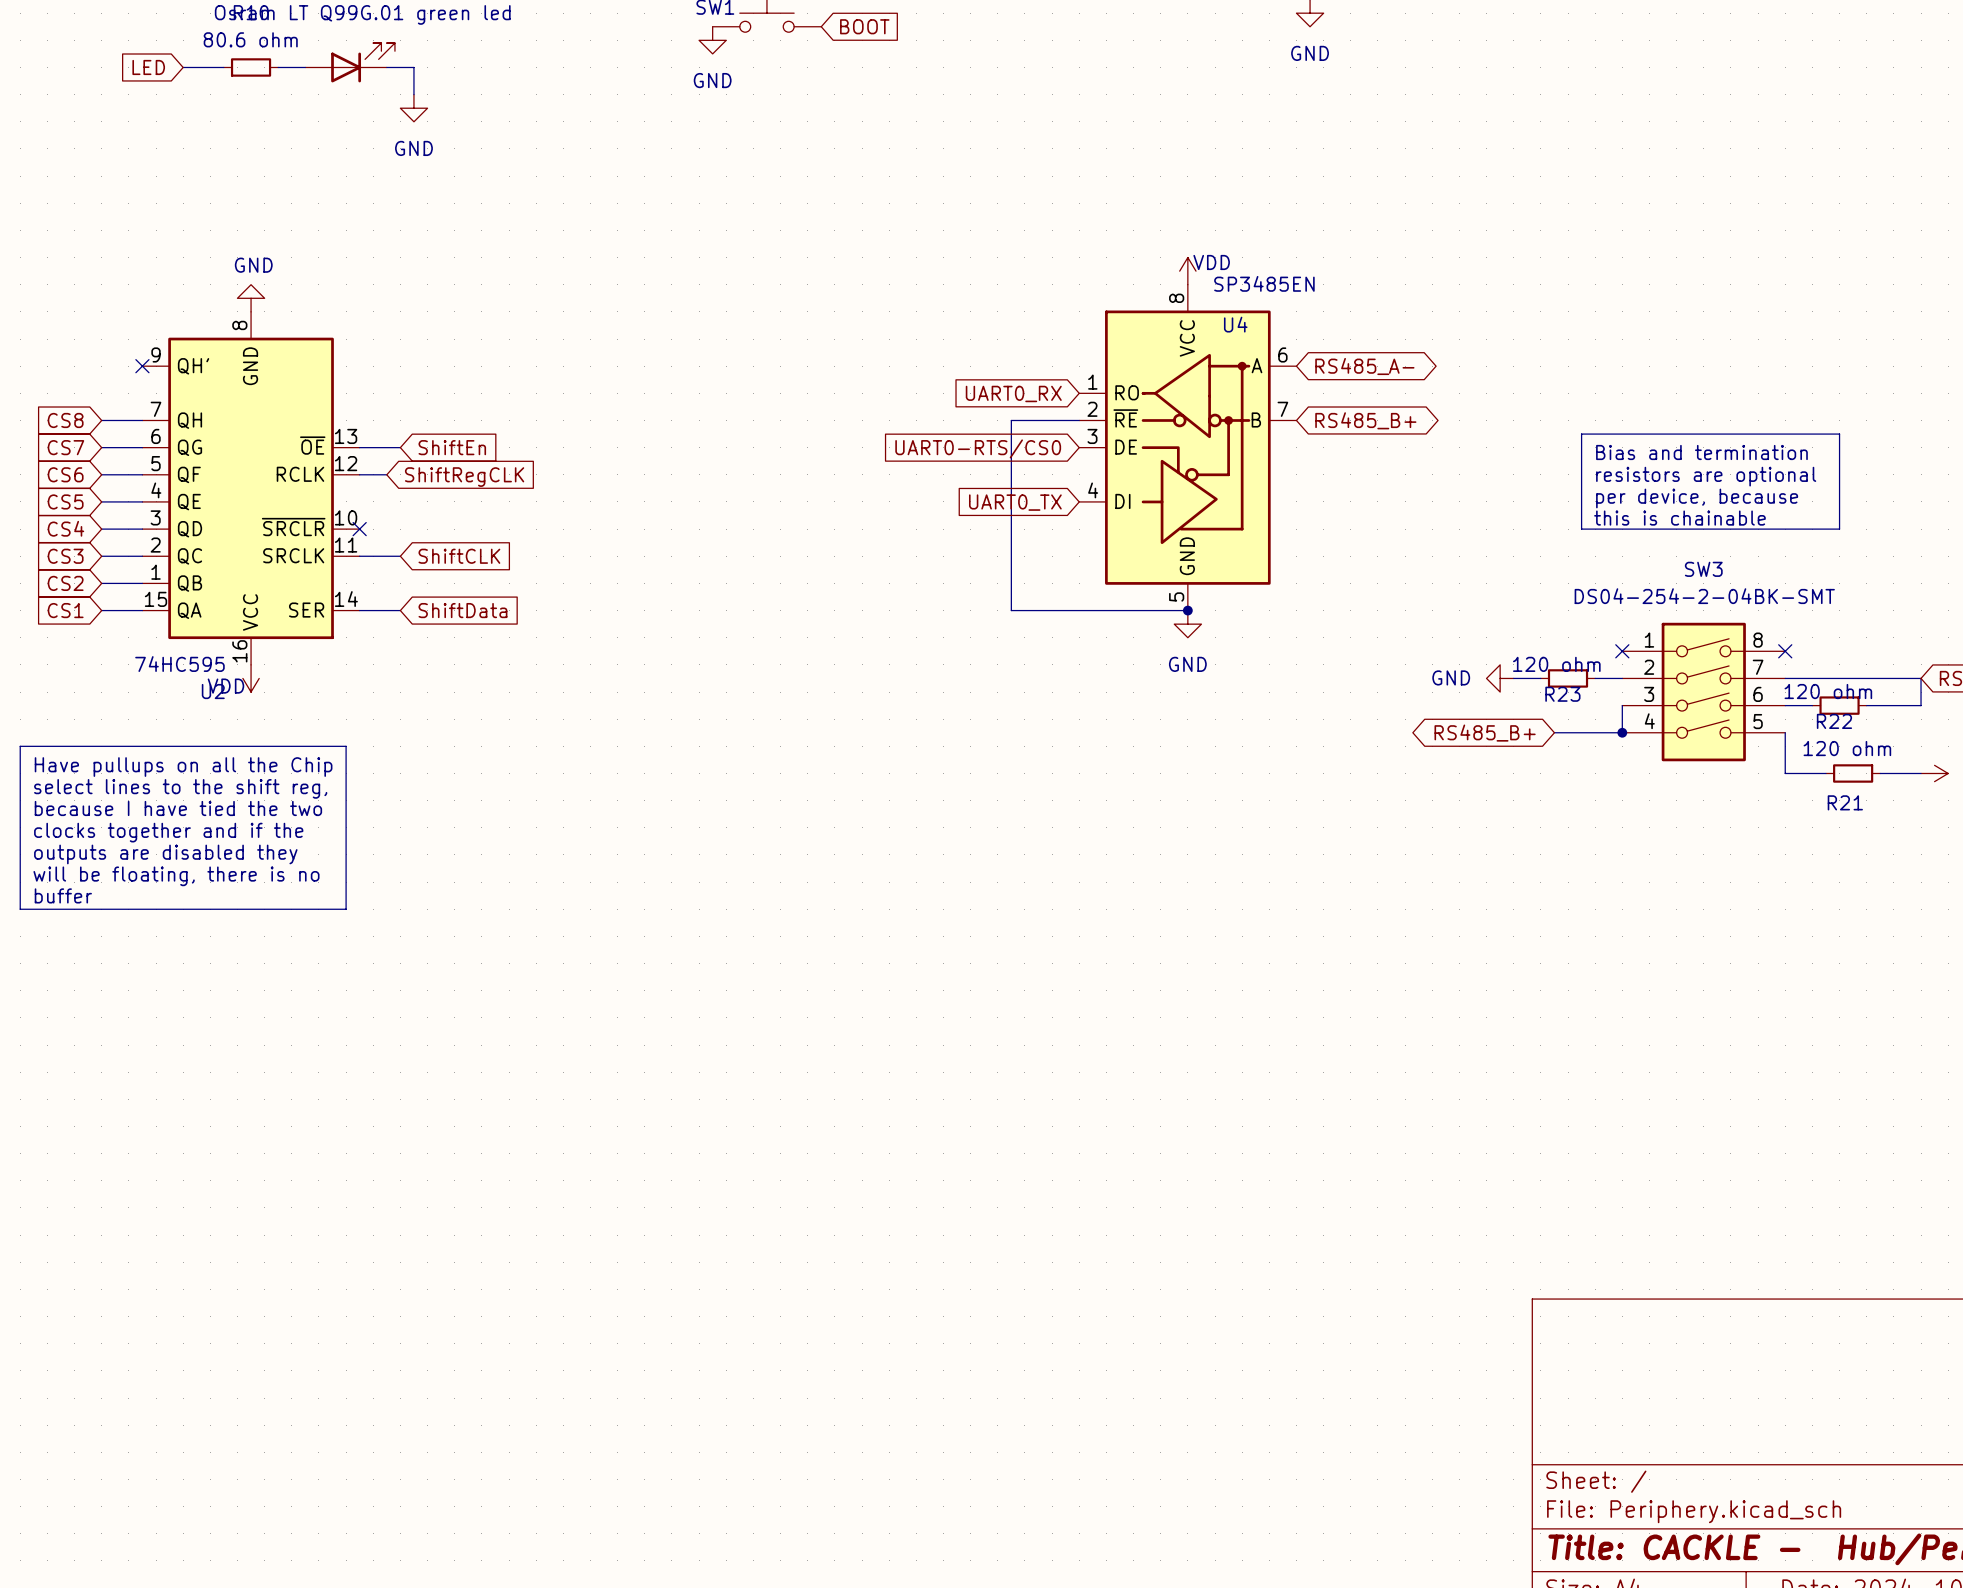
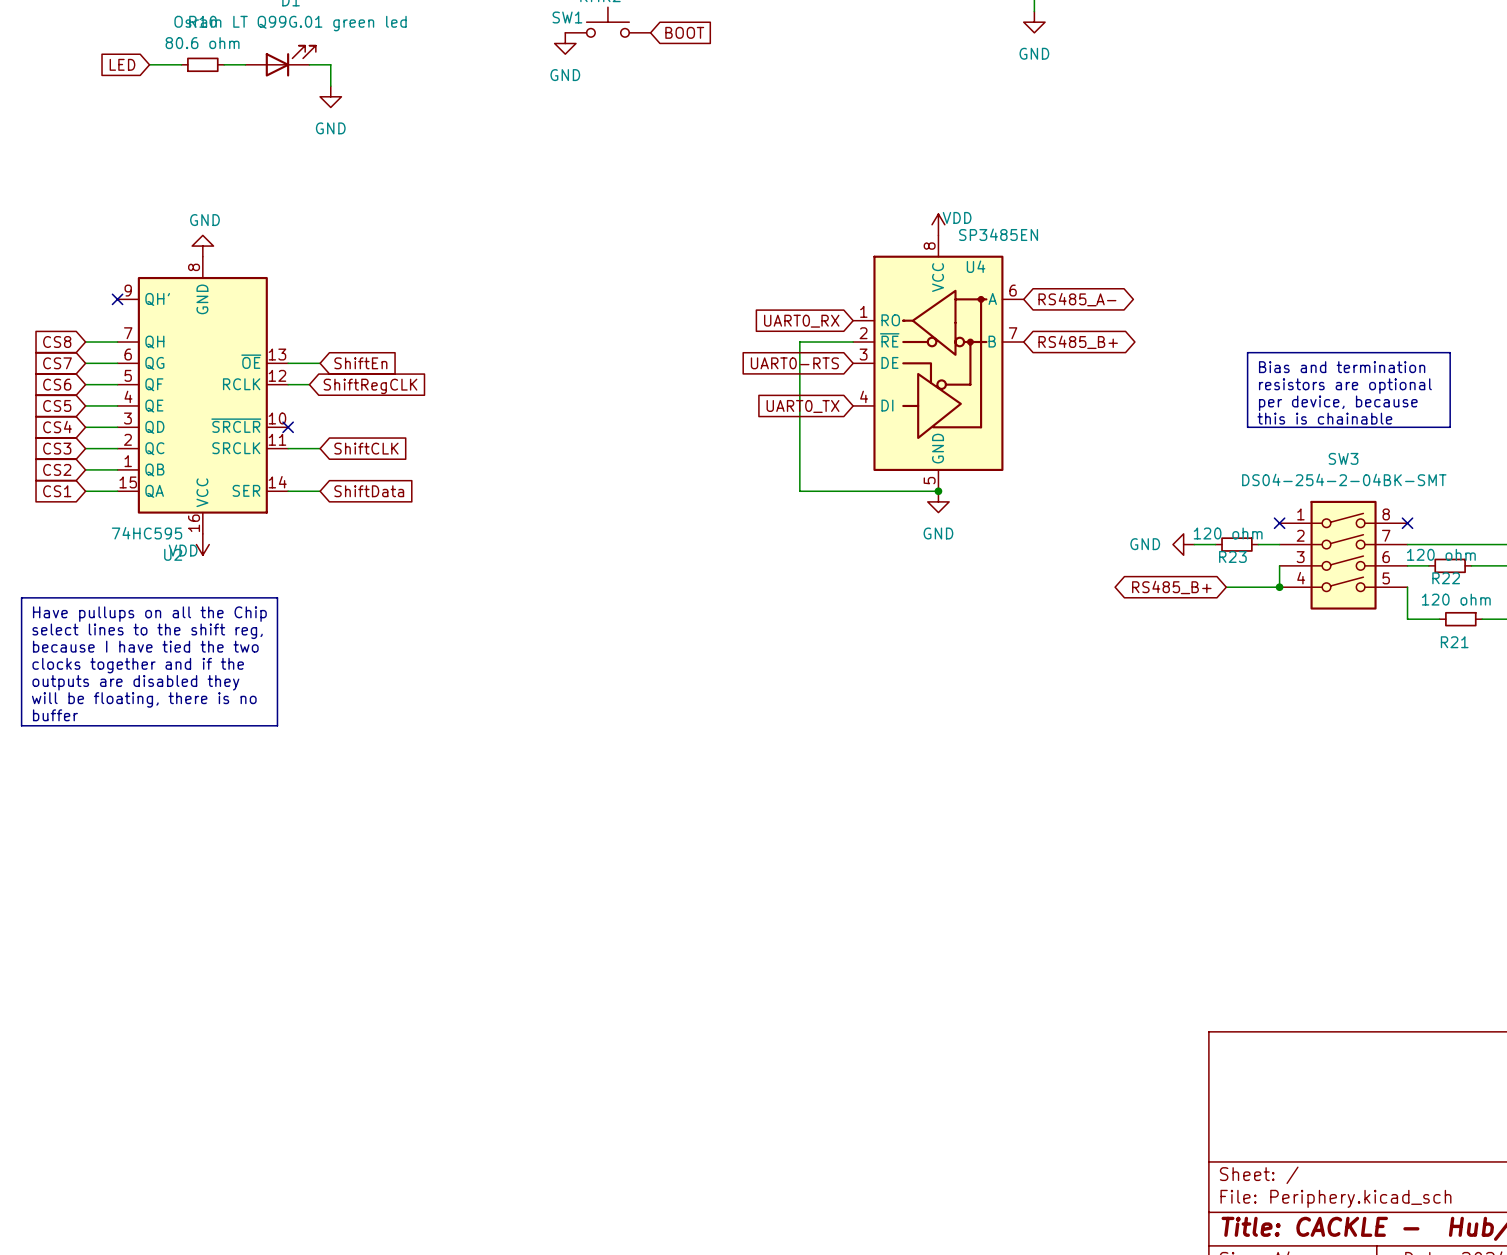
global label: UART0-RTS/CS0 (978, 448) -> UART0-RTS (794, 363)

